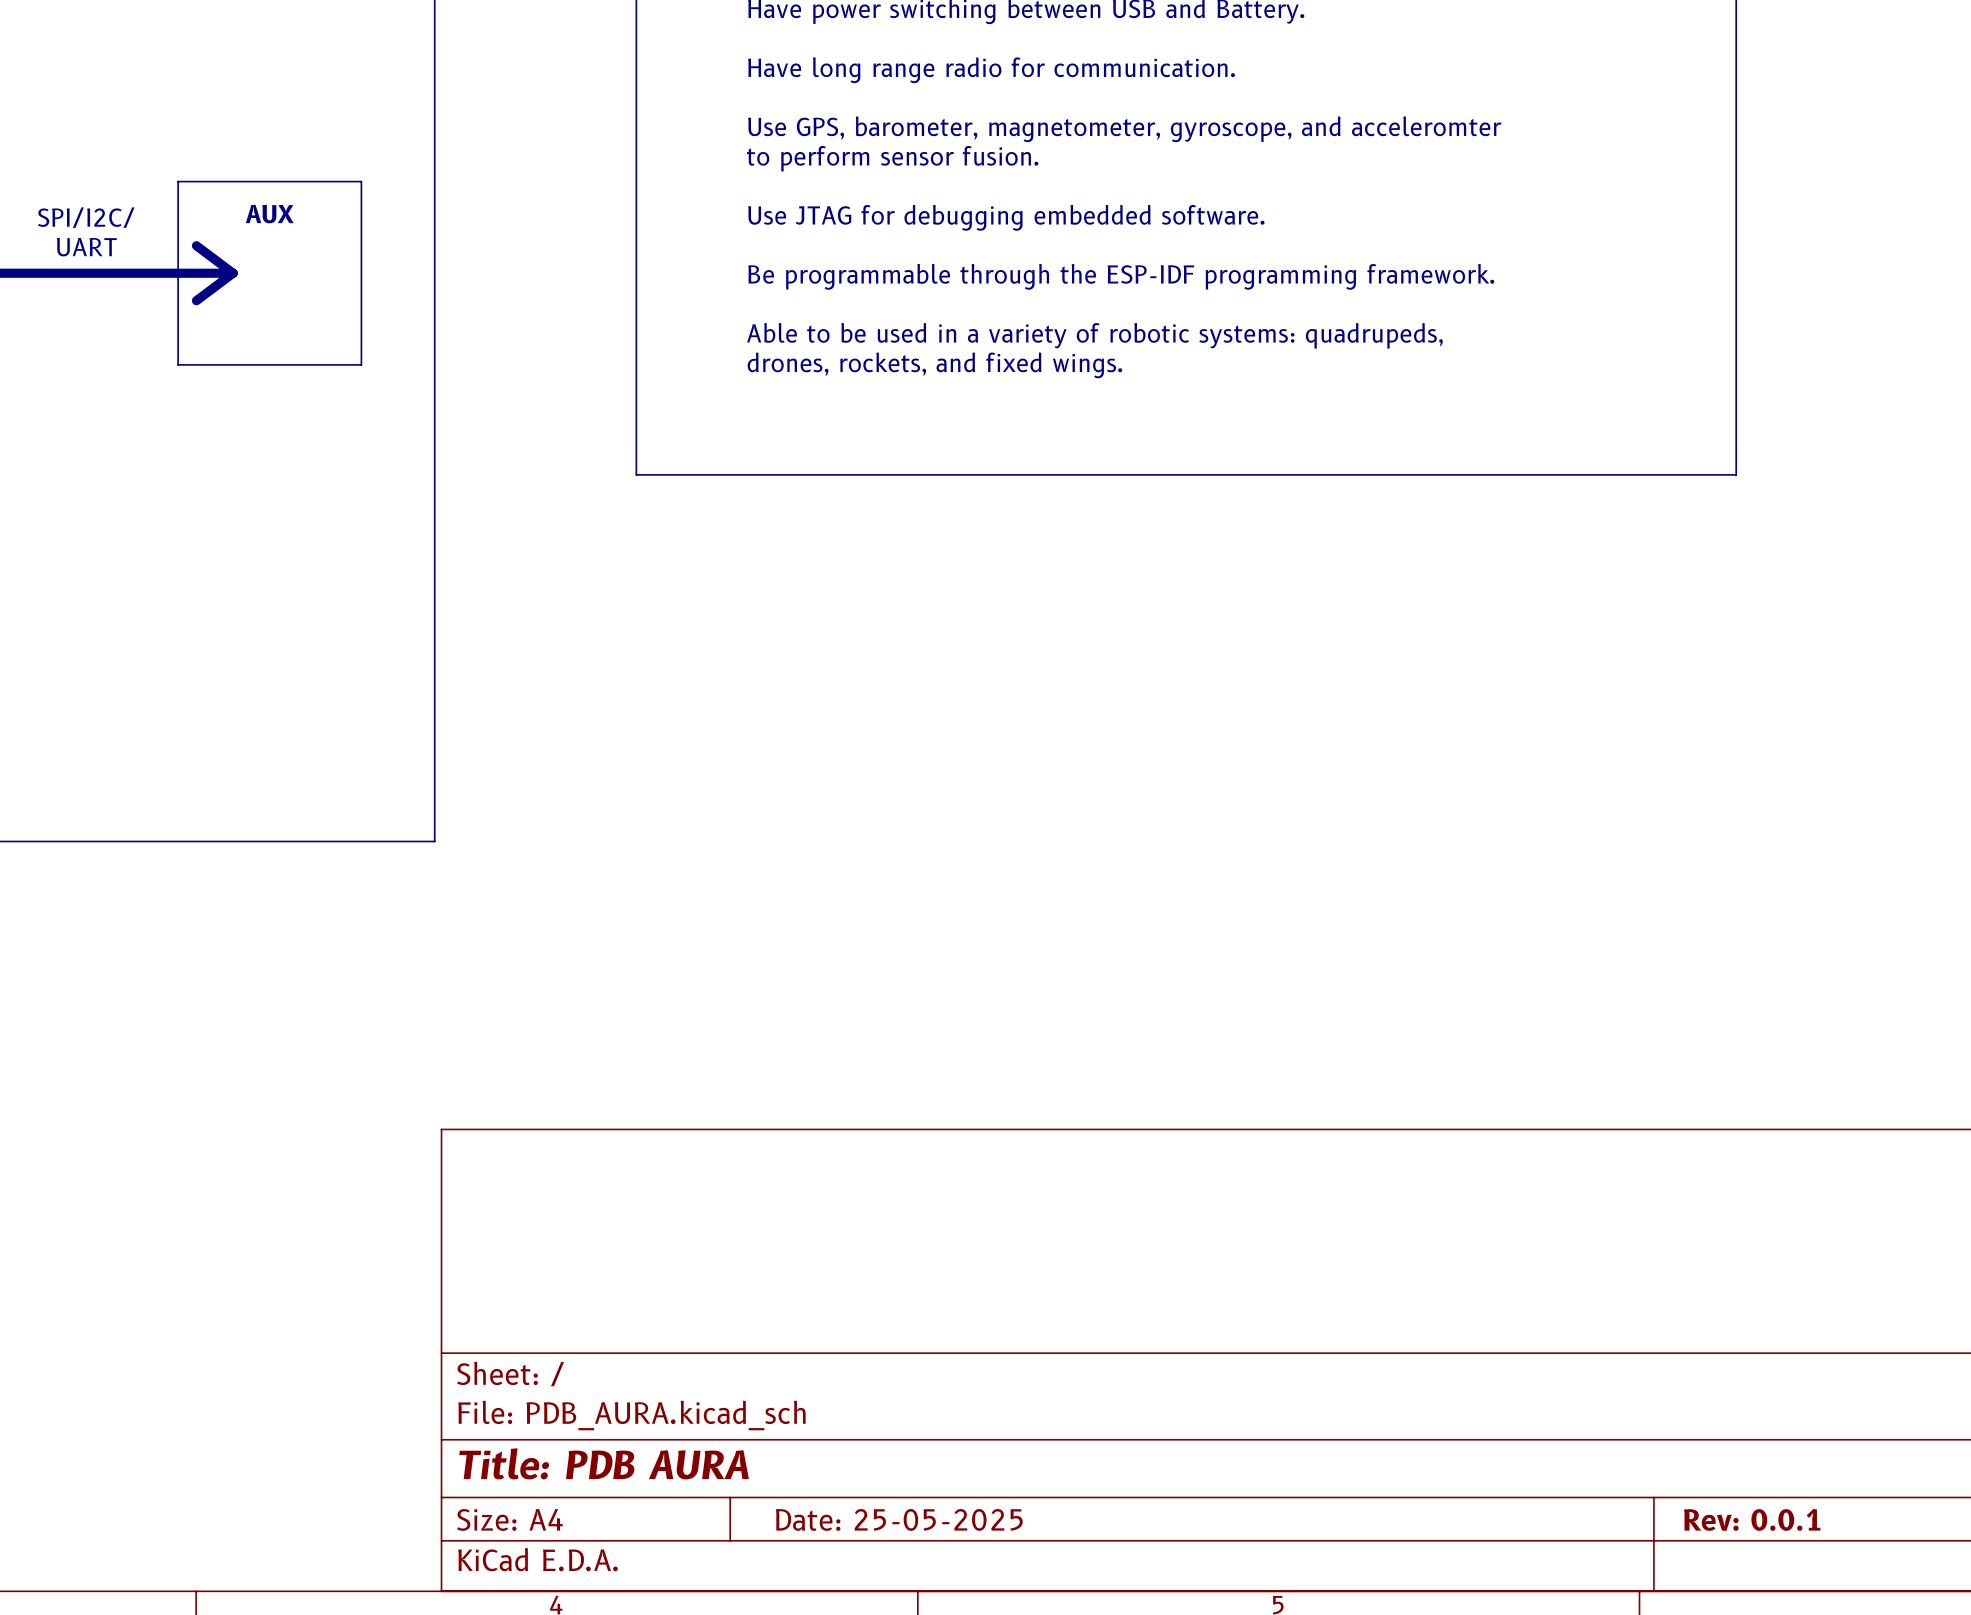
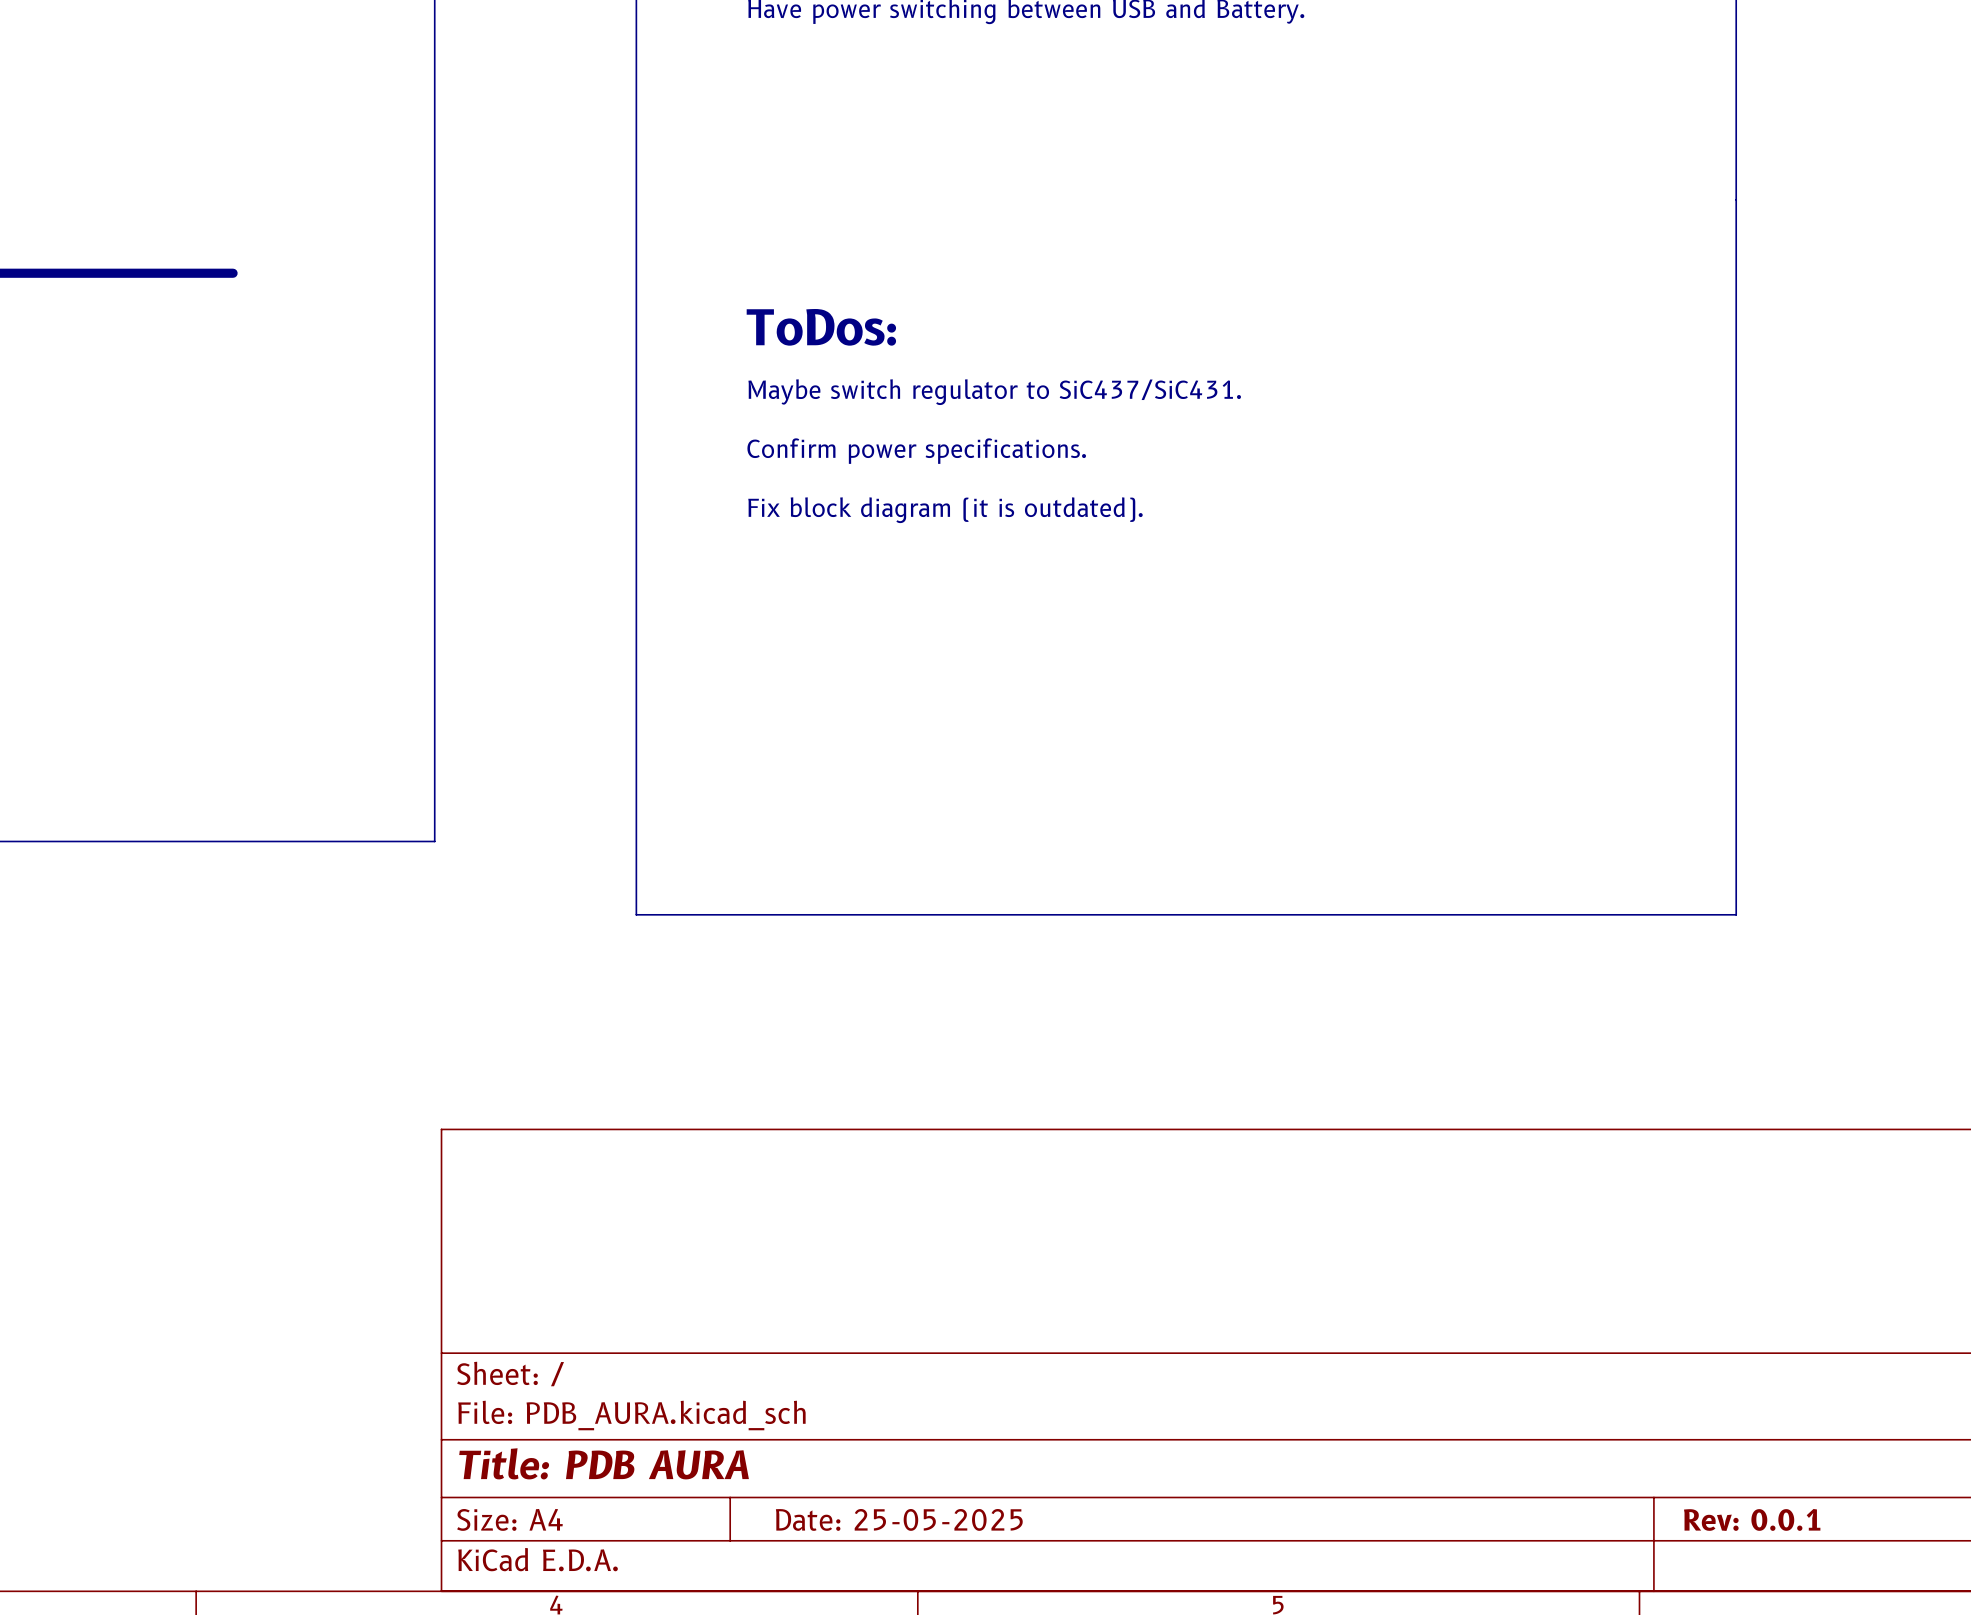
text: Have long range radio for communication. (991, 70) -> none
text: Use GPS, barometer, magnetometer, gyroscope, and acceleromter (1124, 129) -> none
text: to perform sensor fusion. (892, 158) -> none
line: (178, 181) (361, 181) (361, 364) (178, 364) (178, 181) -> none
text: AUX (269, 214) -> none
text: SPI/I2C/ (86, 217) -> none
text: Use JTAG for debugging embedded software. (1006, 217) -> none
line: (196, 245) (233, 273) (196, 300) -> none
text: UART (86, 247) -> none
text: Be programmable through the ESP-IDF programming framework. (1121, 276) -> none
text: Able to be used in a variety of robotic systems: quadrupeds, (1094, 335) -> ToDos: (821, 327)
text: drones, rockets, and fixed wings. (934, 365) -> none
text: none -> Maybe switch regulator to SiC437/SiC431. (994, 392)
text: none -> Confirm power specifications. (916, 451)
line: (636, 474) (1736, 474) -> (636, 474) (636, 914) (1736, 914) (1736, 474)
text: none -> Fix block diagram (it is outdated). (945, 510)

